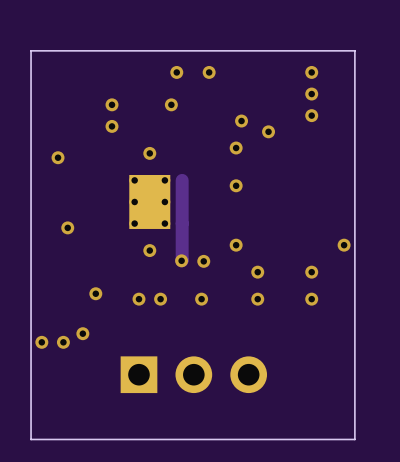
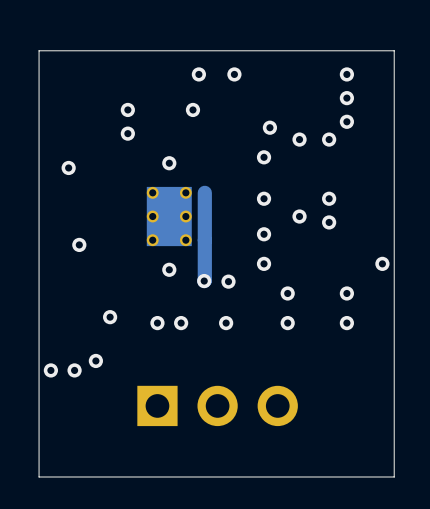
via: none -> (329, 139)
via: none -> (329, 198)
via: none -> (299, 216)
via: none -> (329, 222)
via: none -> (264, 234)

